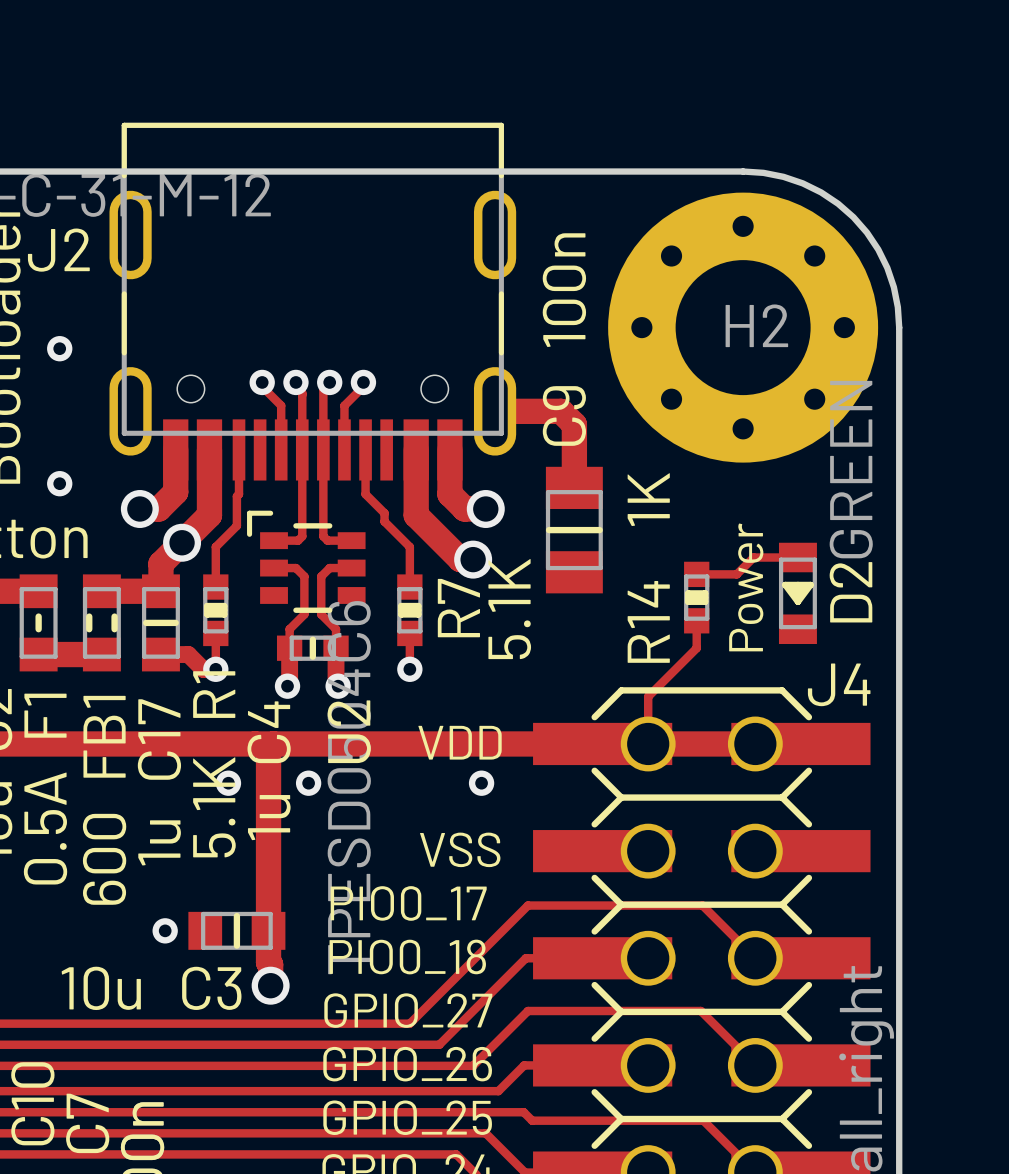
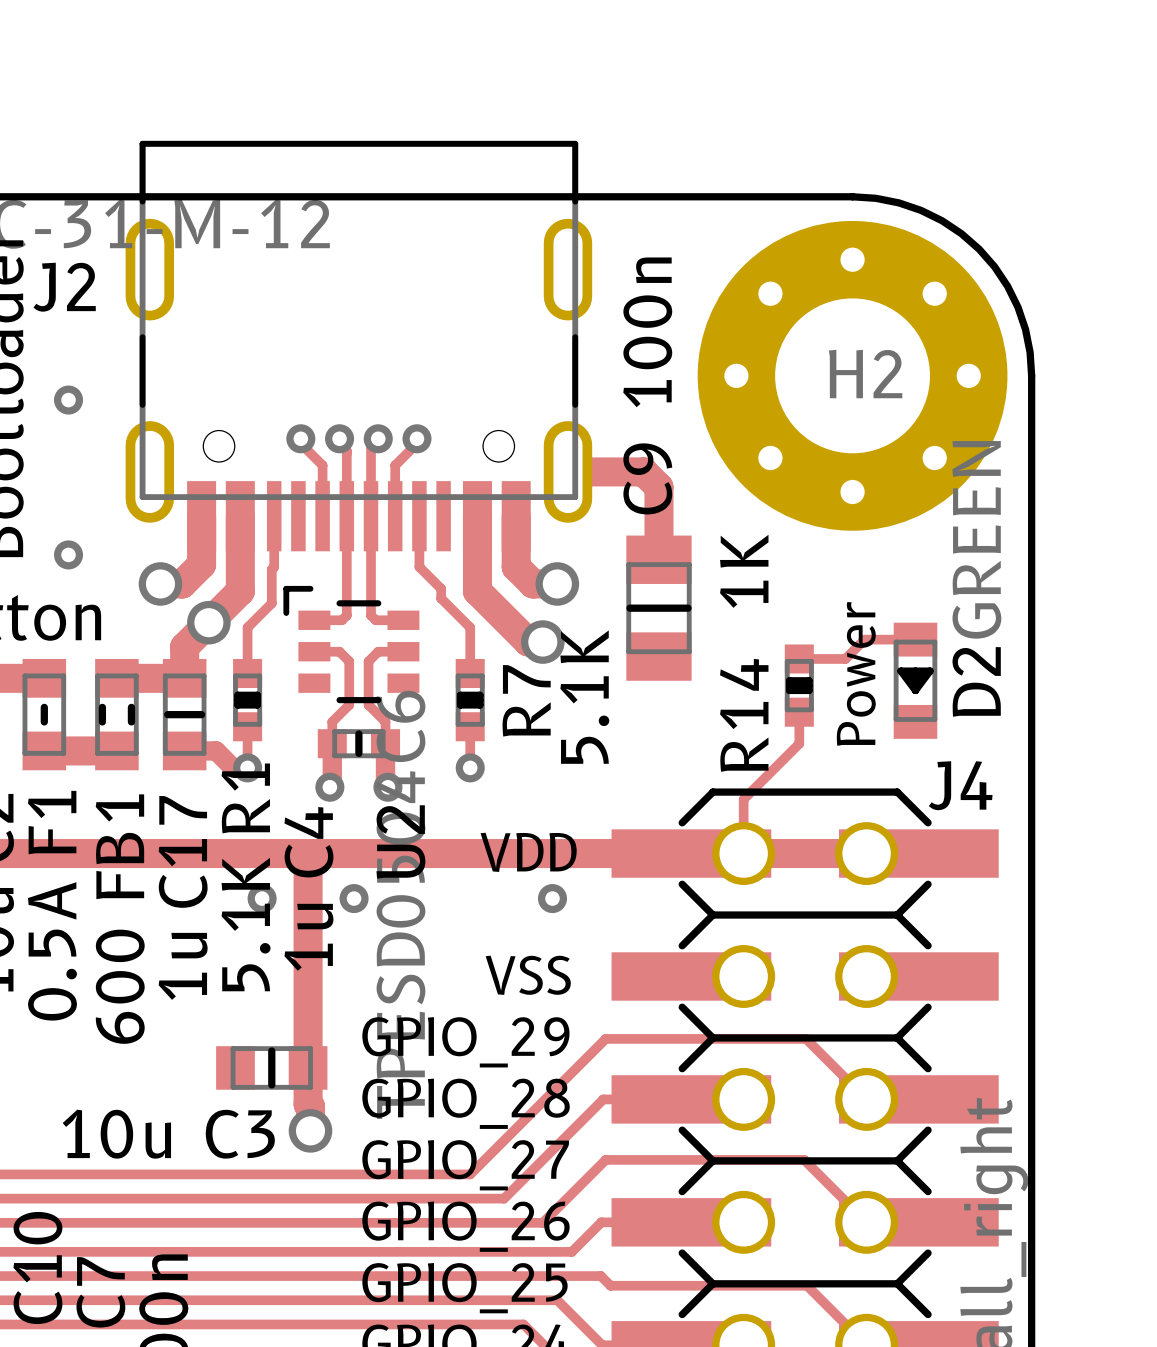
J4 text: PIO0_17 (408, 903) -> GPIO_29 (465, 1042)
via: (165, 930) -> none
J4 text: PIO0_18 (407, 957) -> GPIO_28 (466, 1103)

